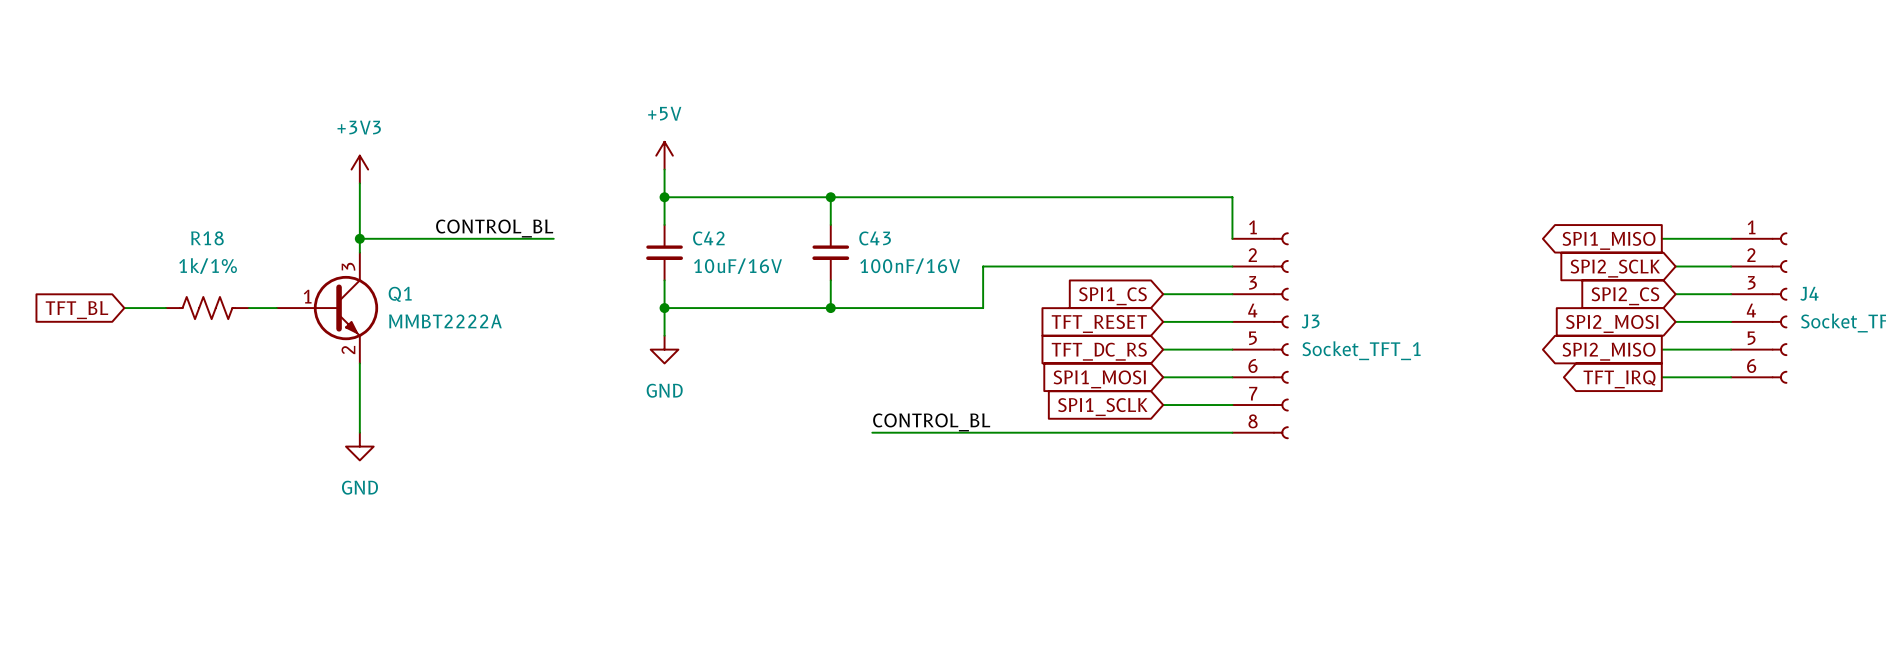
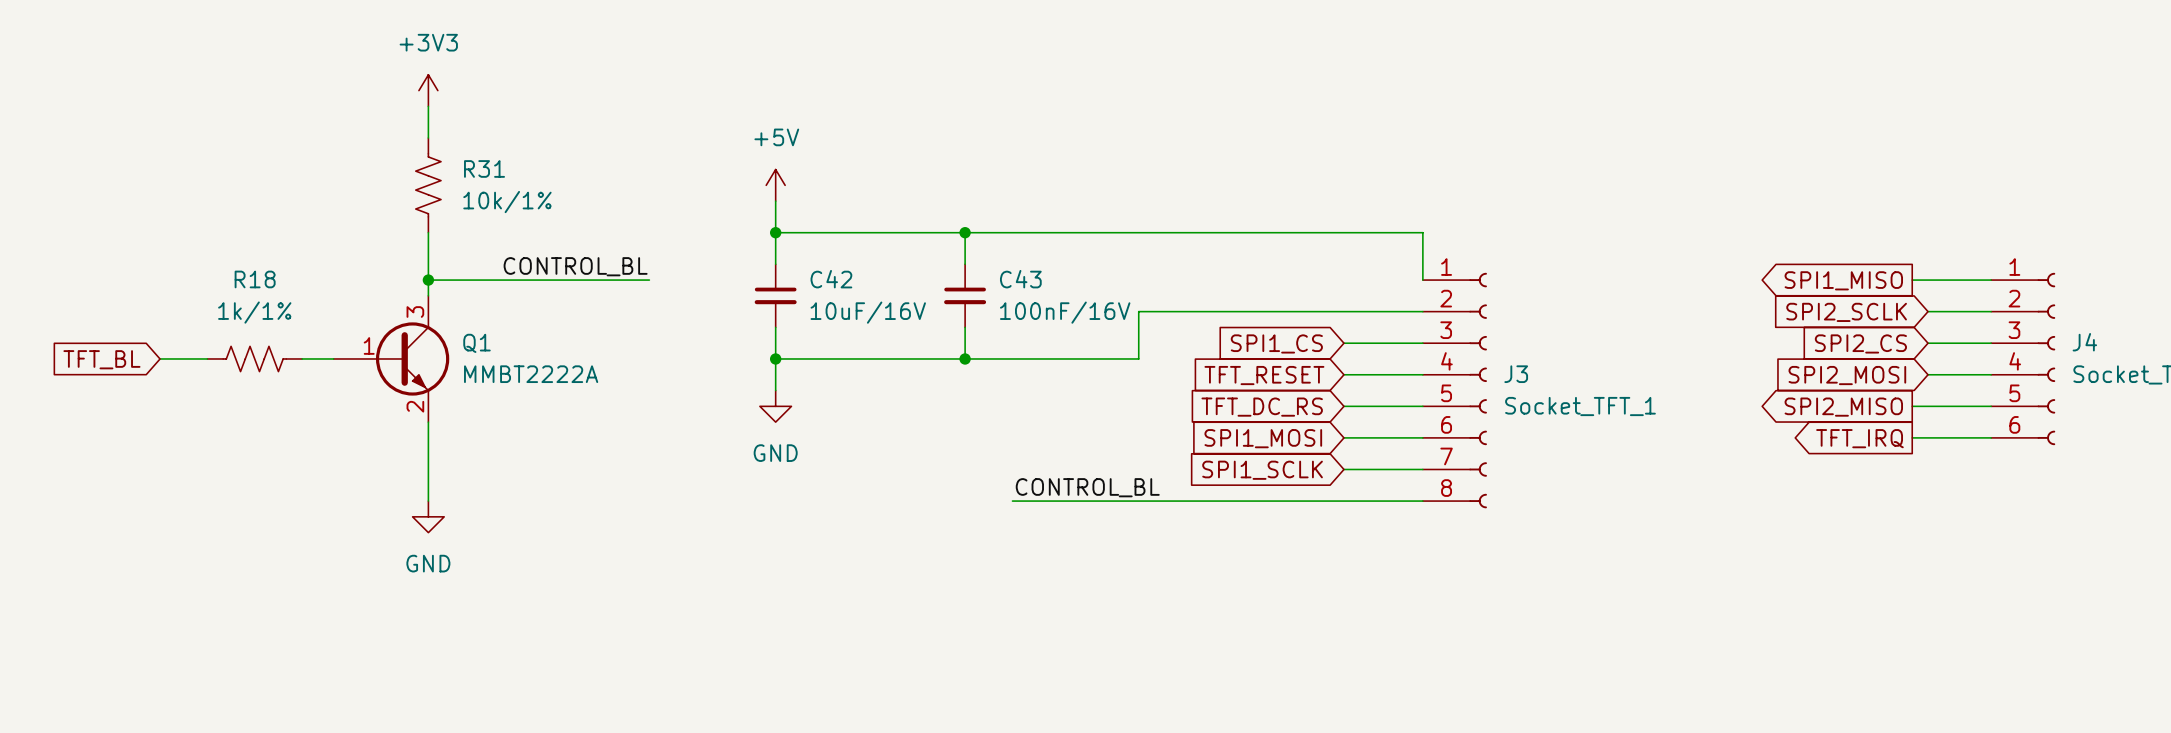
wire: none -> (428, 106) (428, 137)
R31: none -> 10k/1% (428, 185)
power symbol position: +3V3 (359, 169) -> +3V3 (428, 90)

